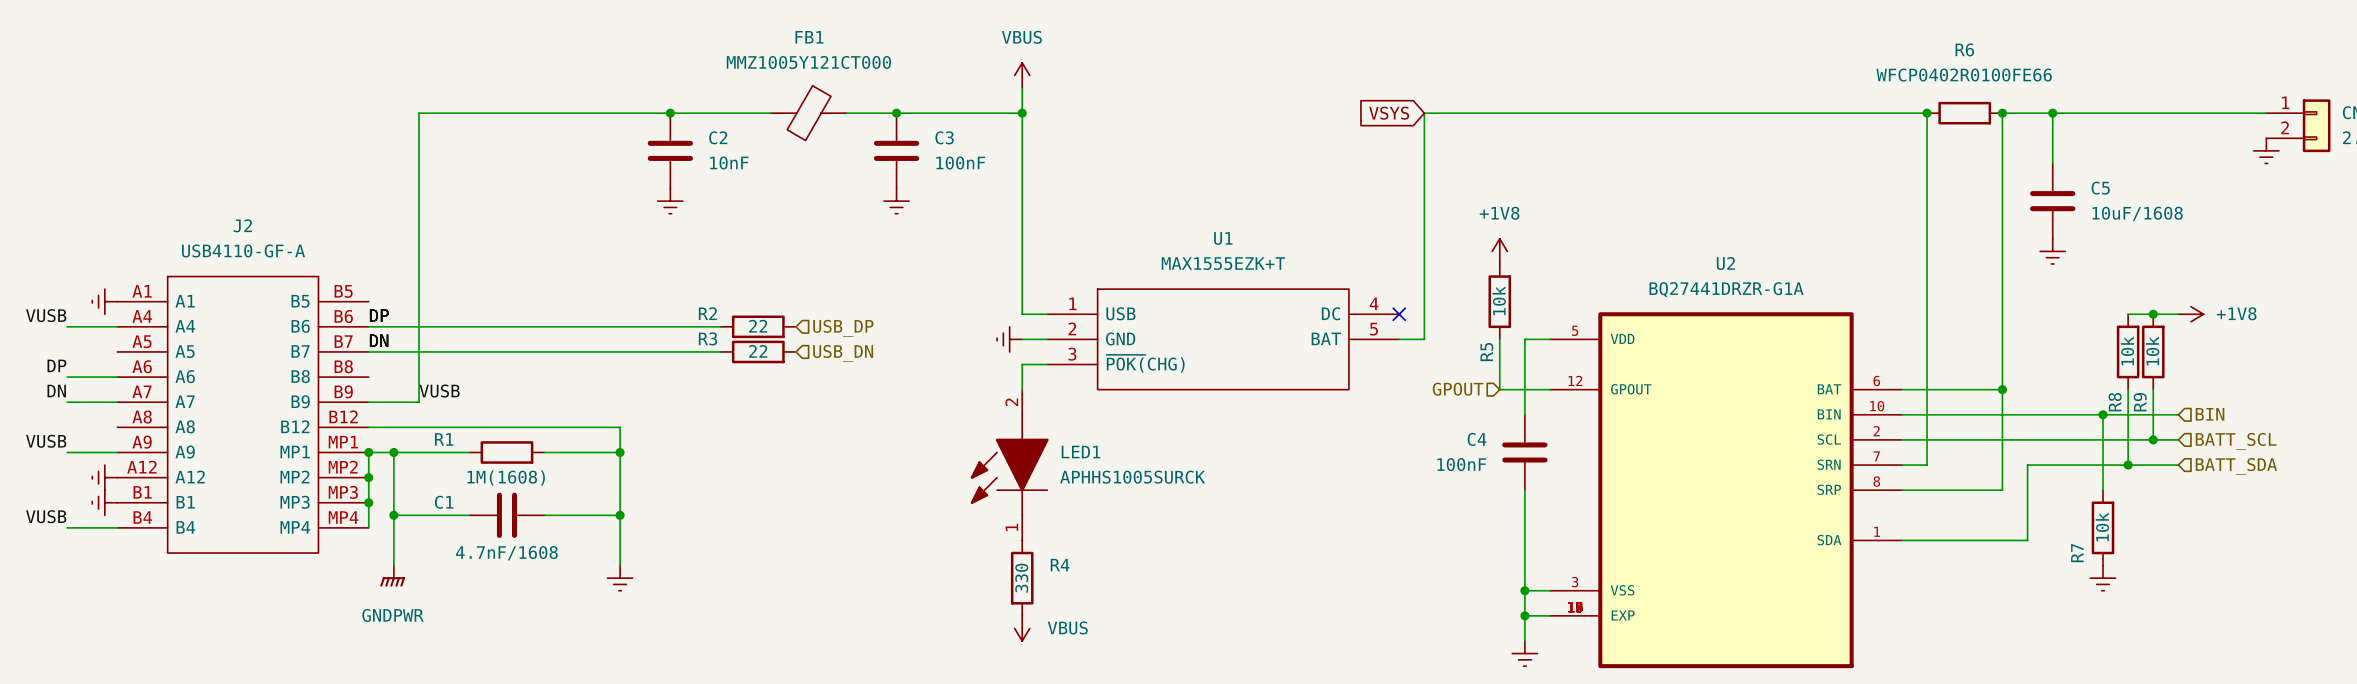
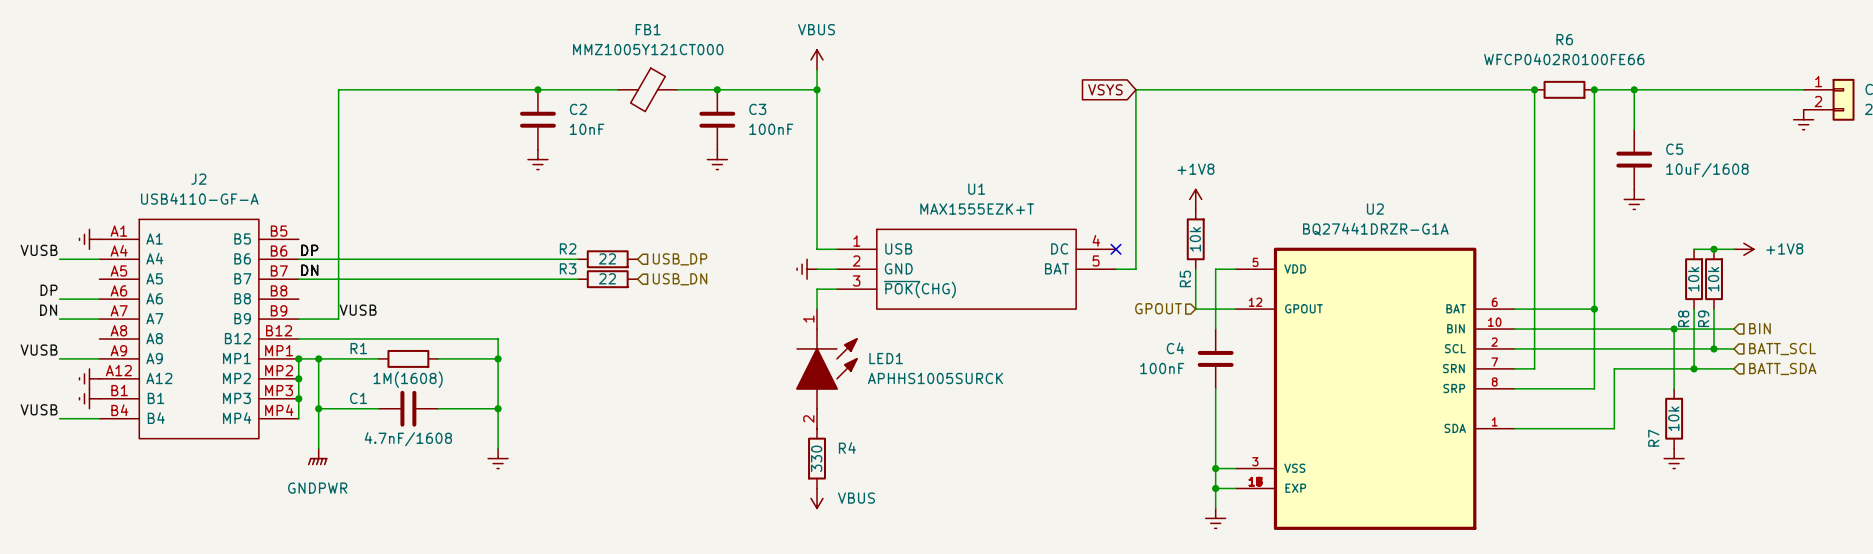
LED1 rotation: 0° (1009, 465) -> 180° (826, 368)

